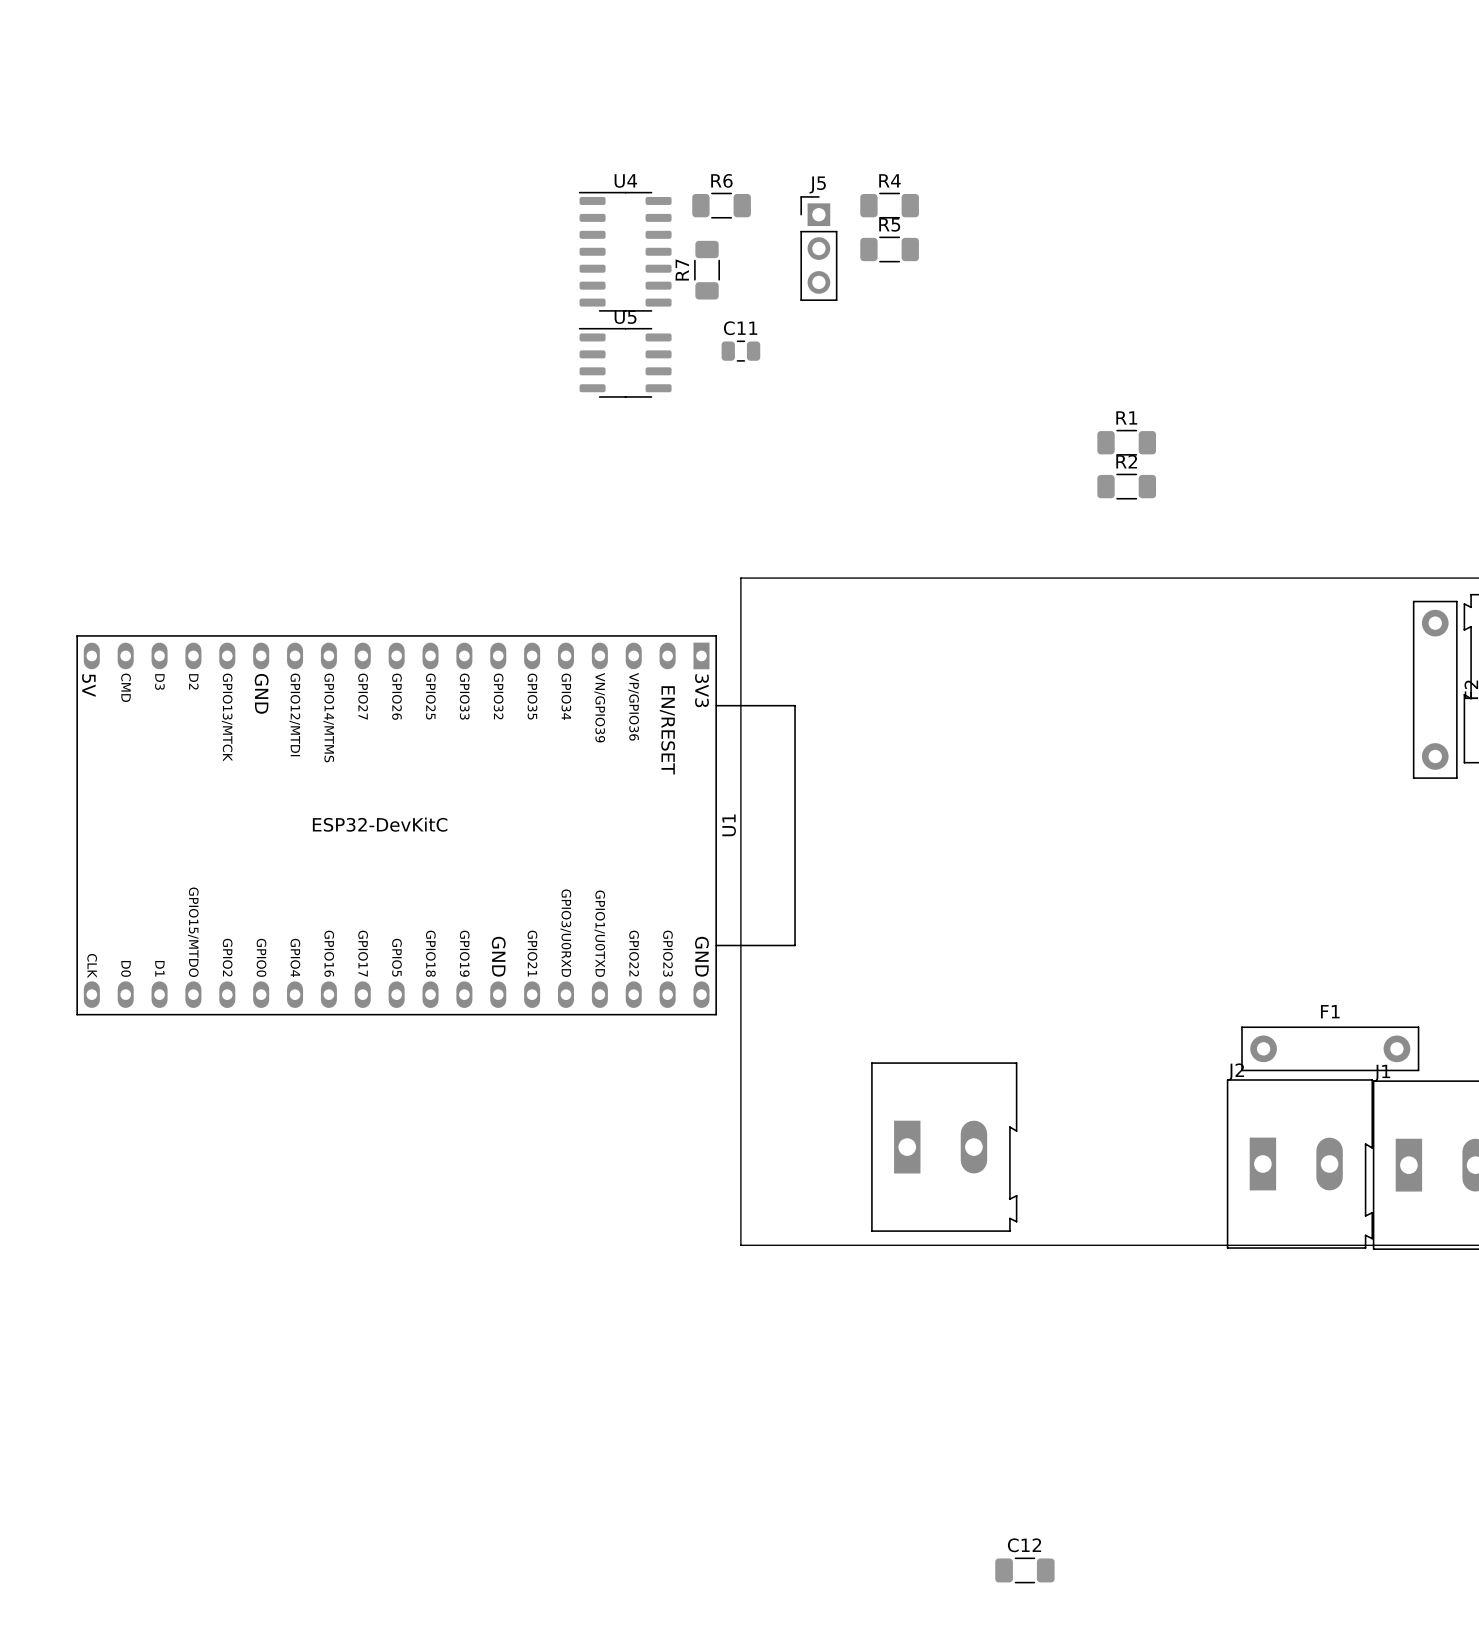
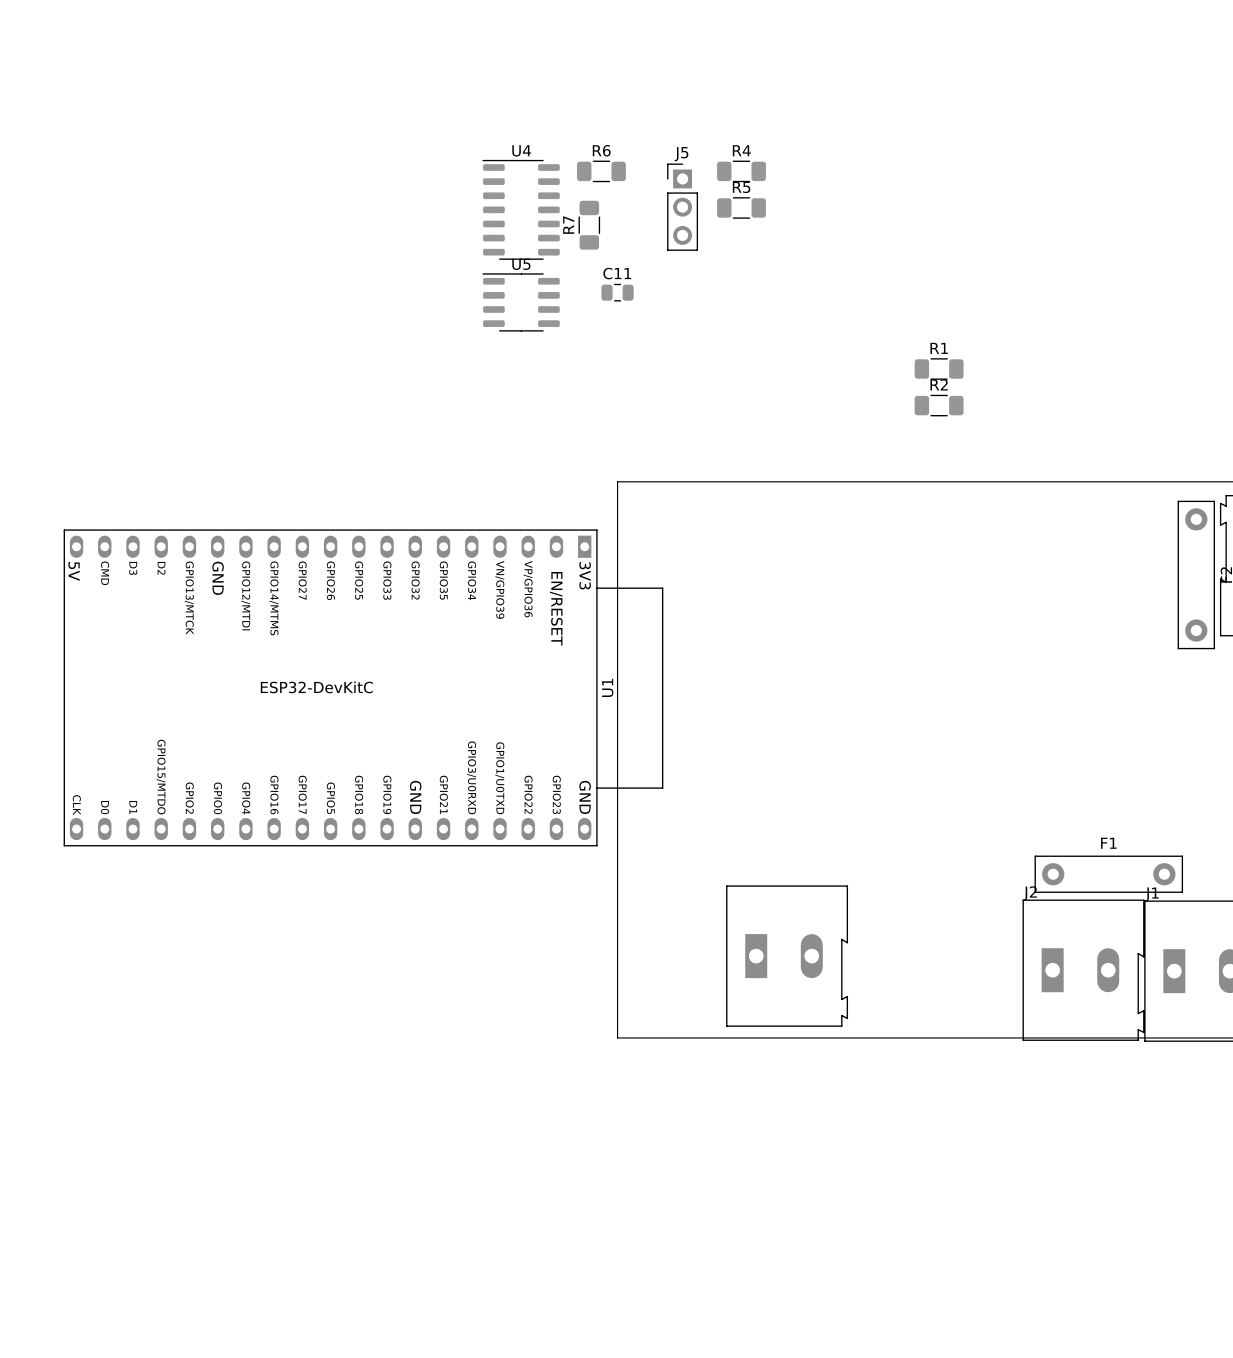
C12: (1024, 1570) -> none

